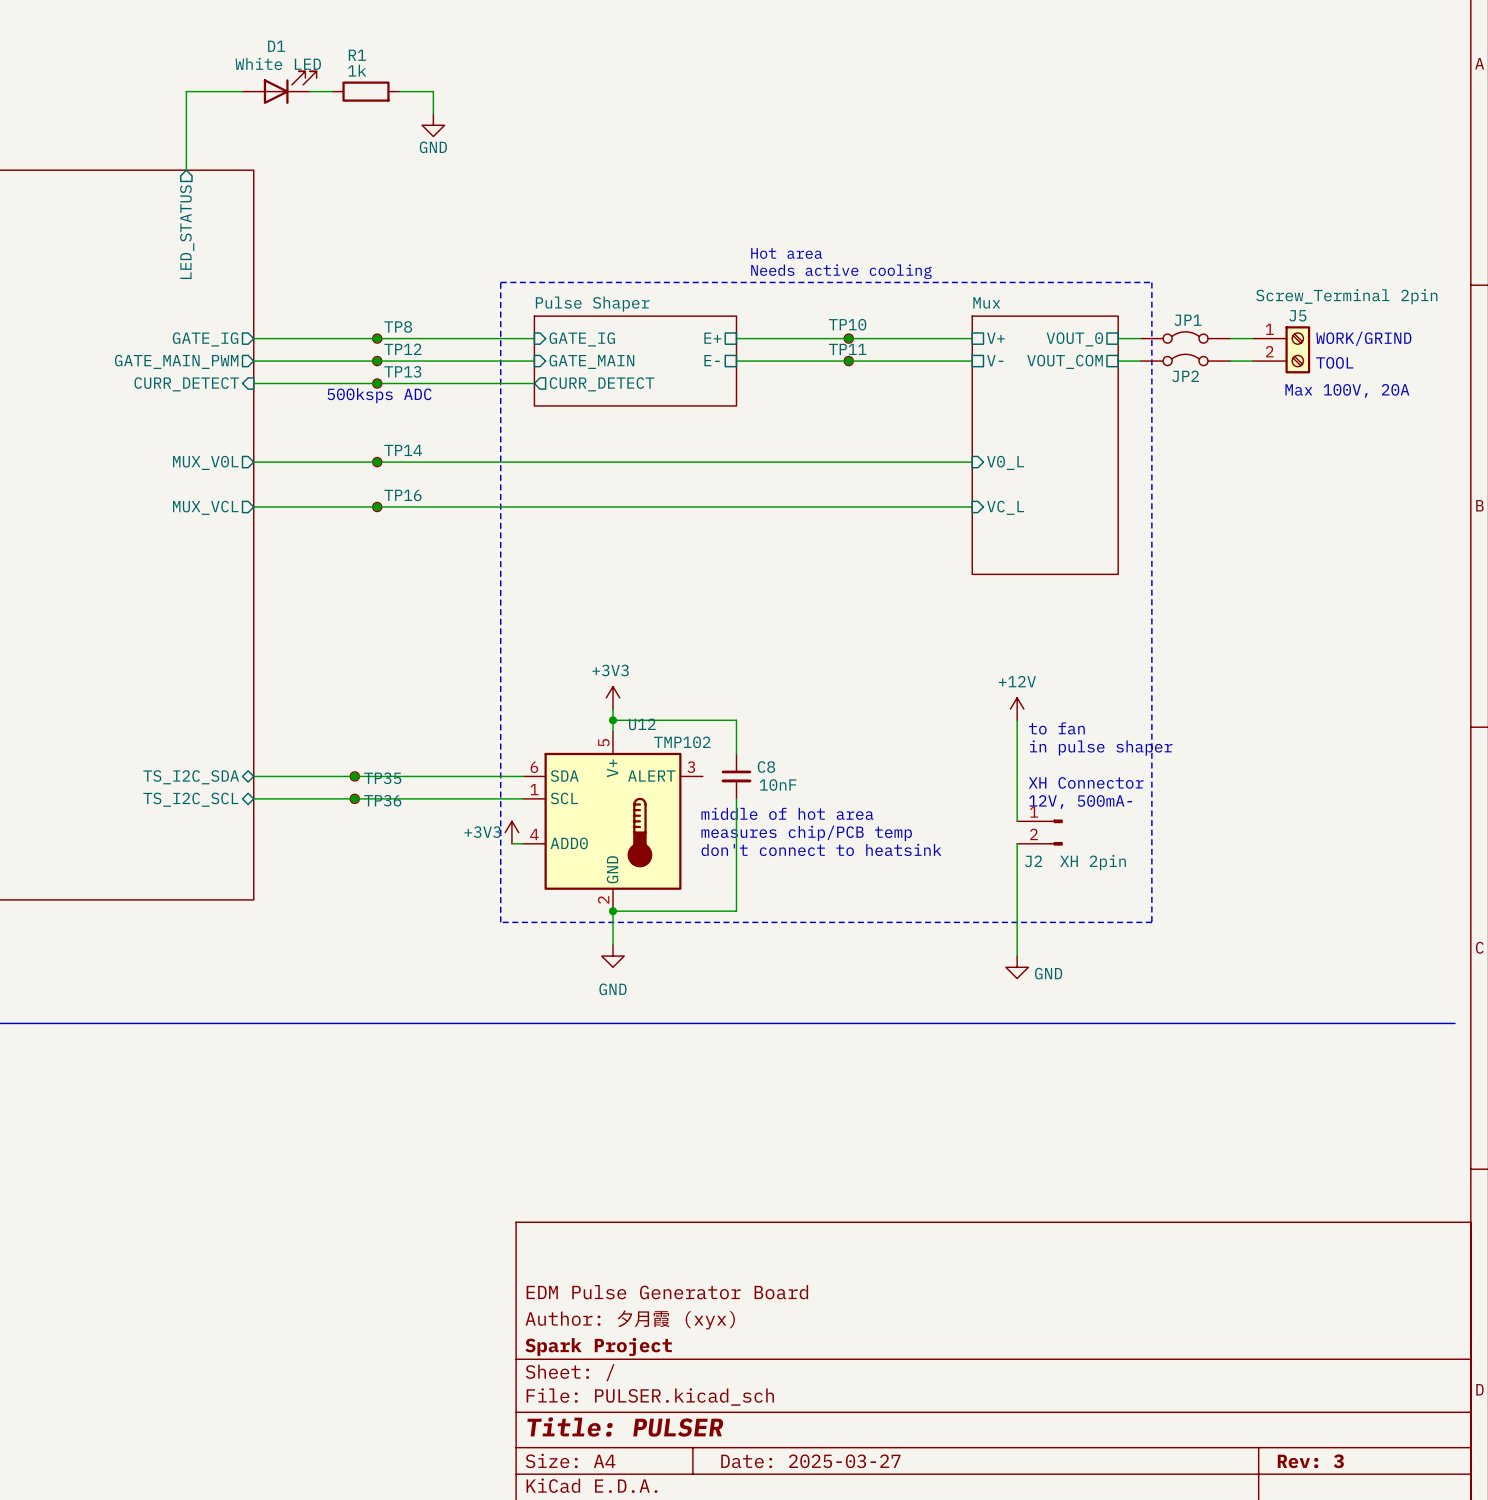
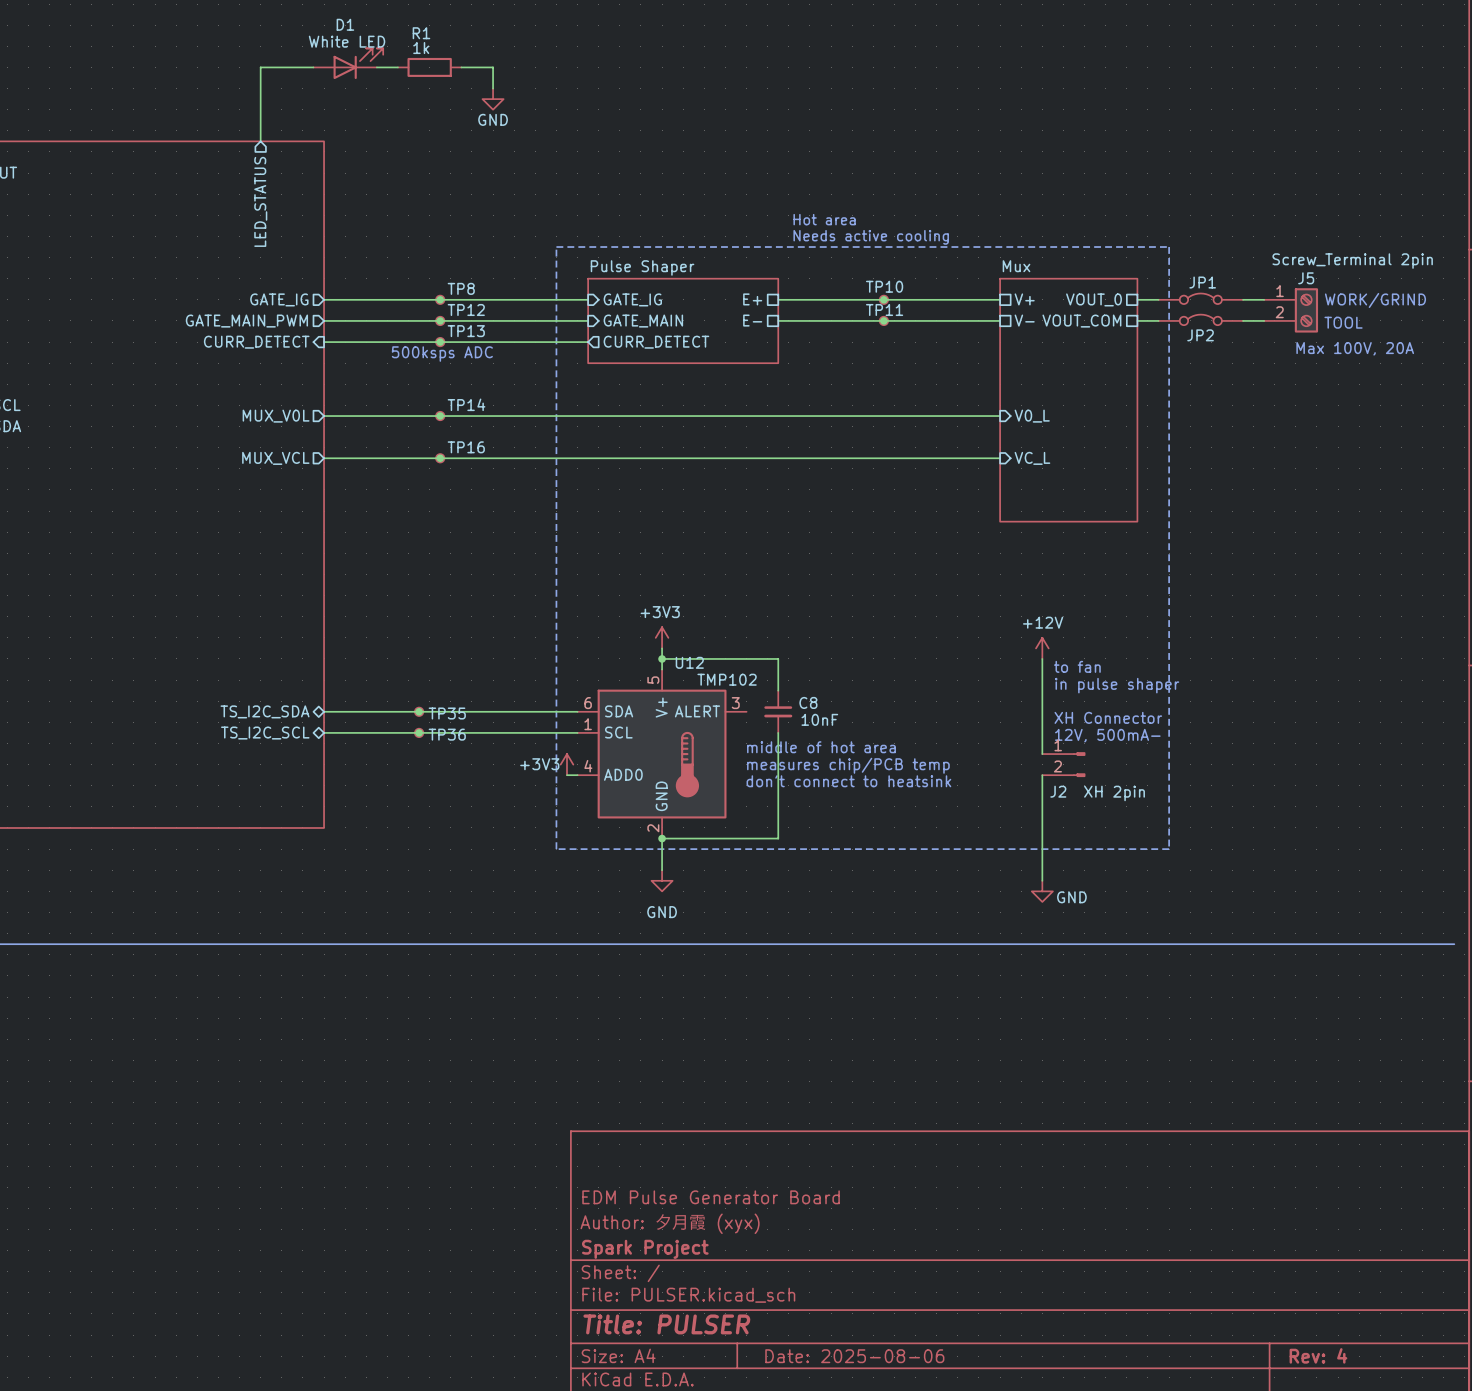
title block: Date: 2025-03-27 (810, 1461) -> Date: 2025-08-06 (854, 1356)
title block: Rev: 3 (1310, 1461) -> Rev: 4 (1318, 1355)

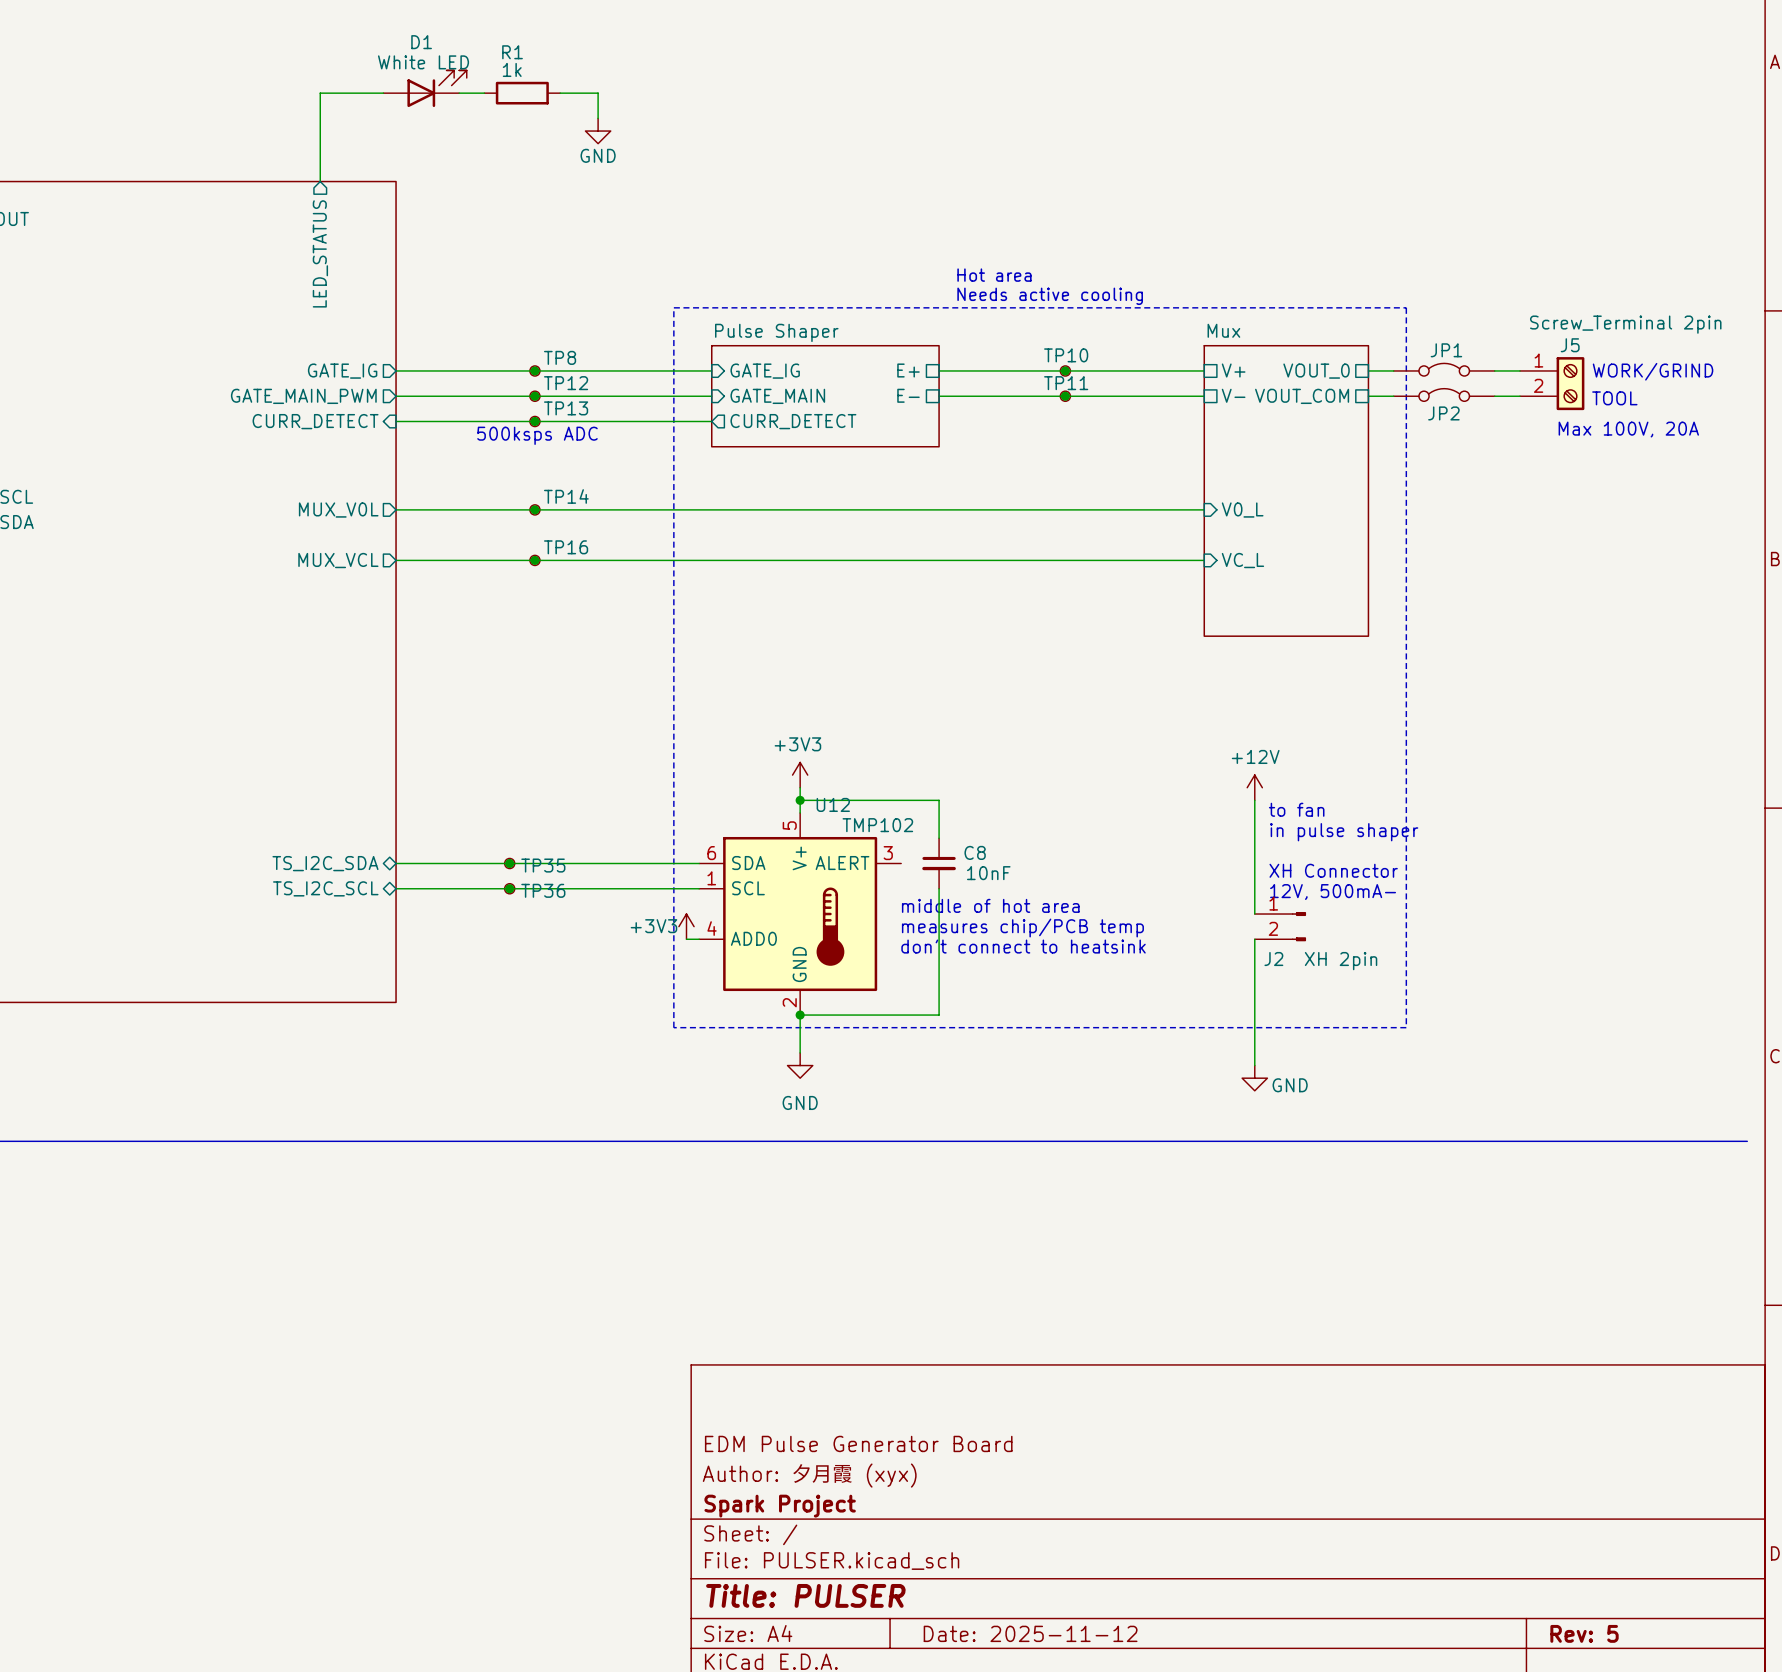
title block: Rev: 4 (1318, 1355) -> Rev: 5 (1584, 1633)
title block: Date: 2025-08-06 (854, 1356) -> Date: 2025-11-12 (1030, 1633)

